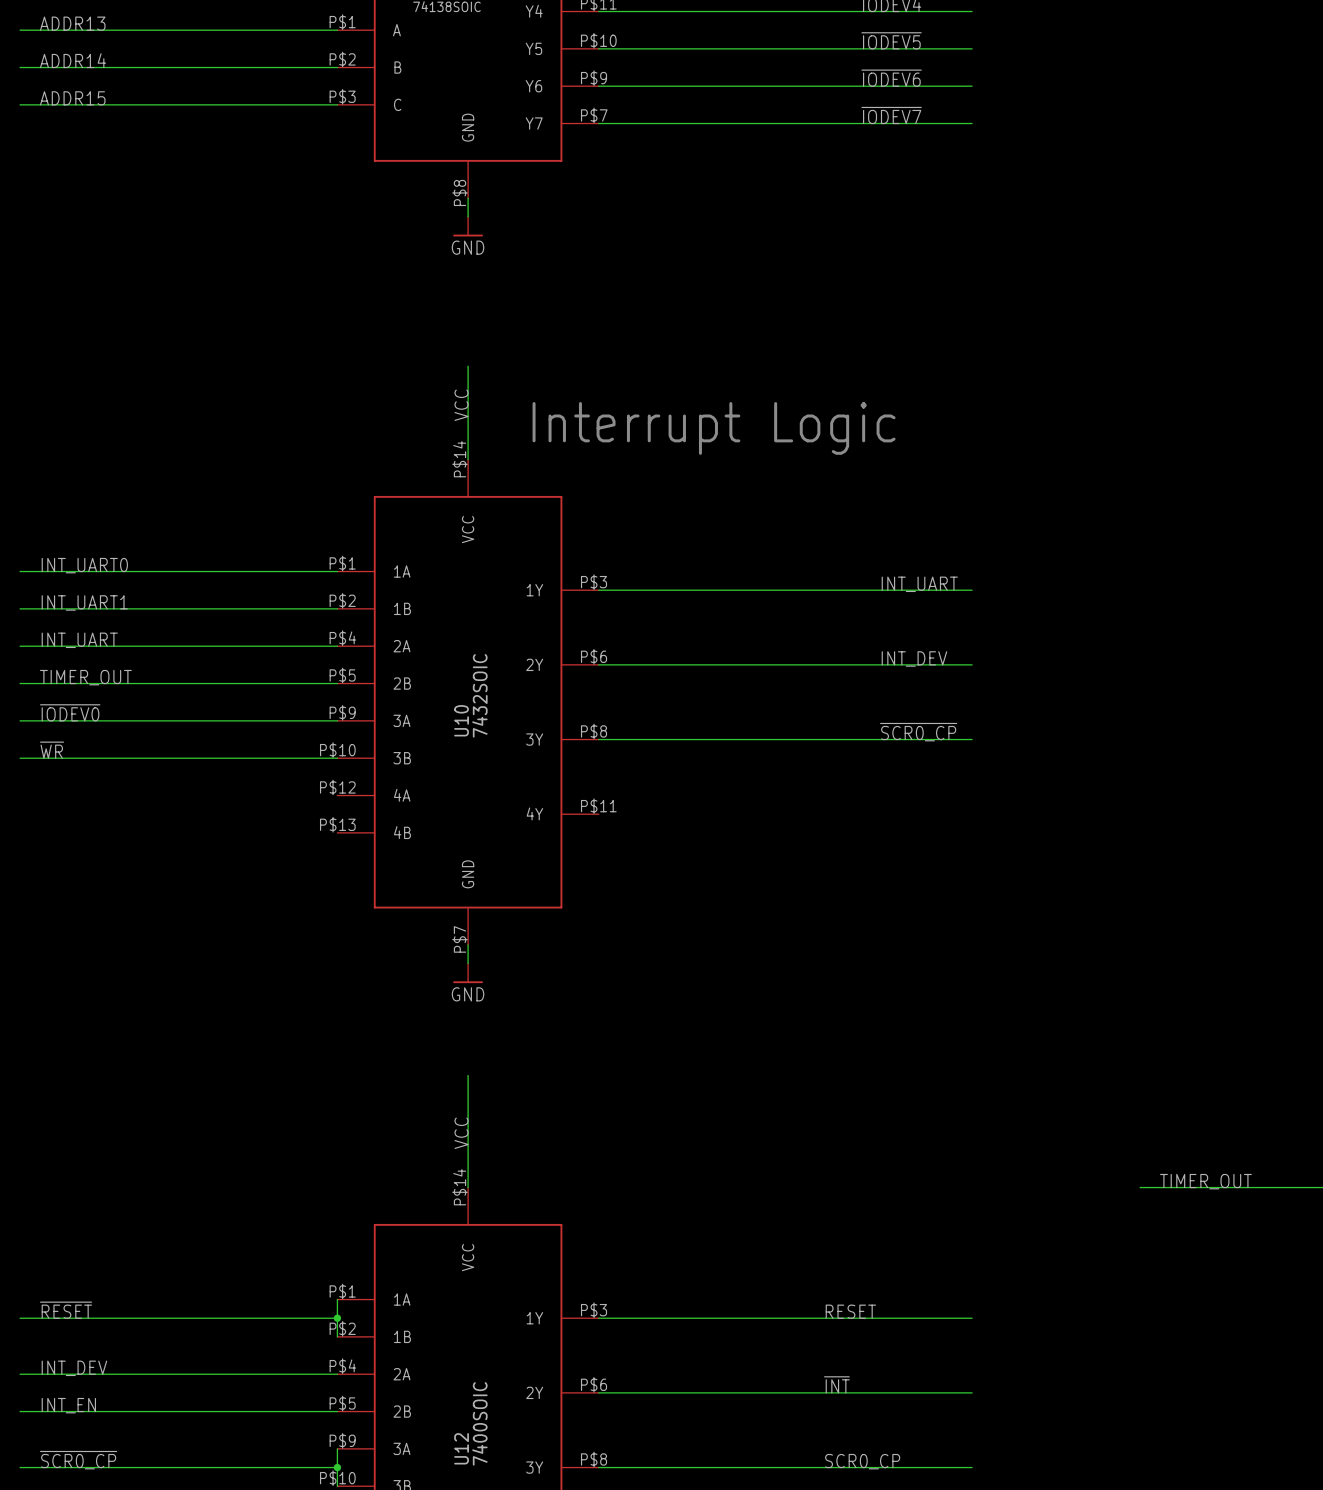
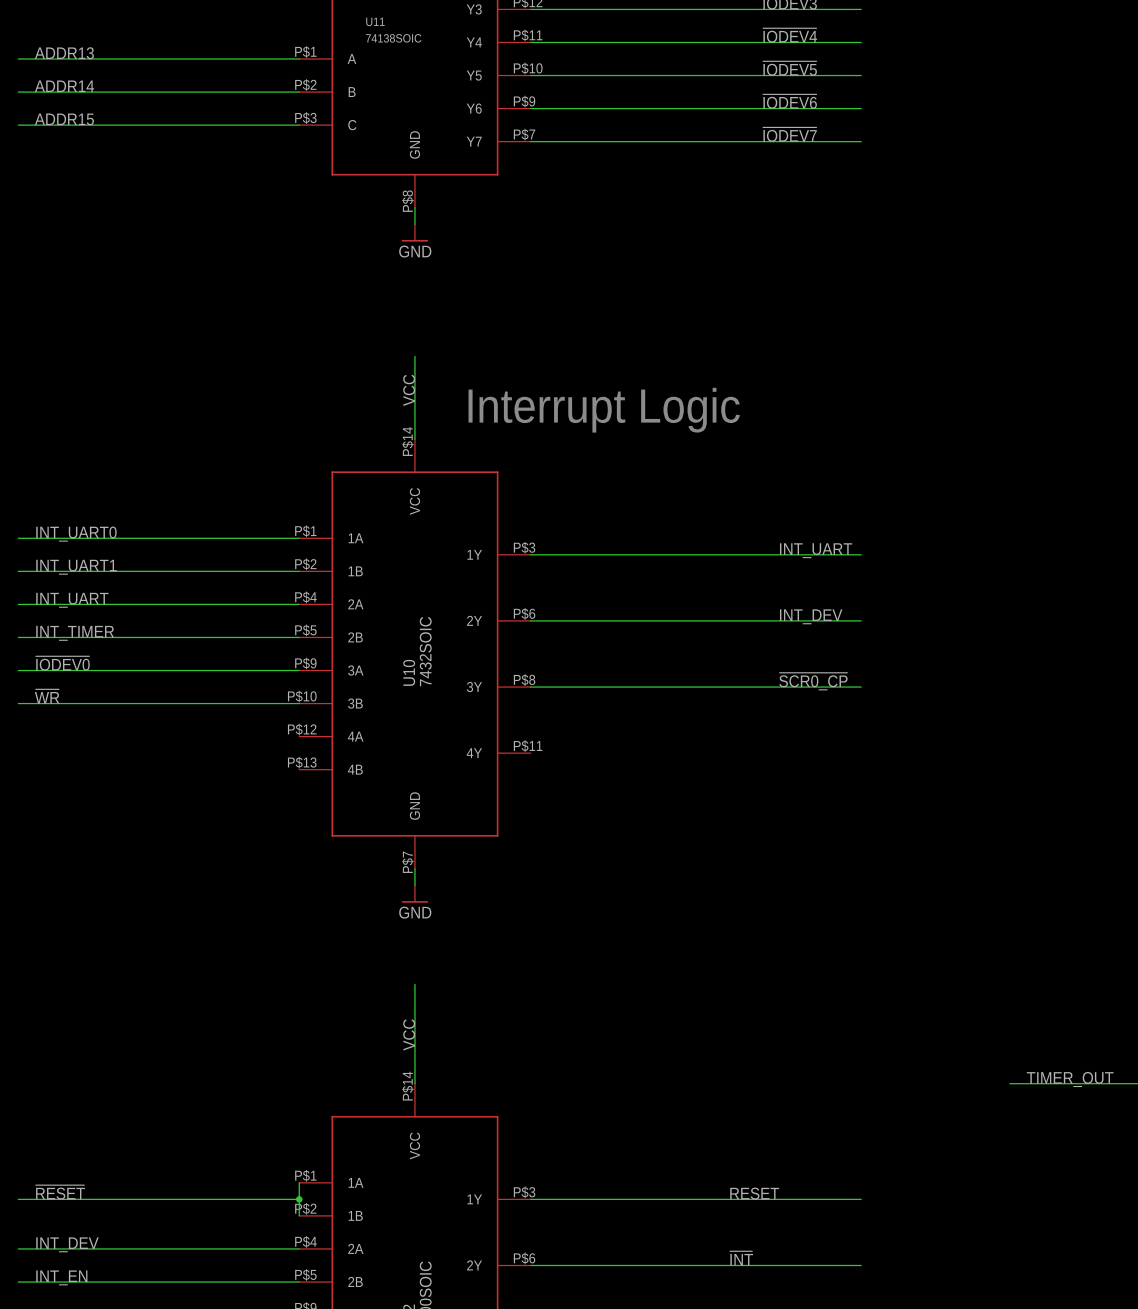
label: TIMER_OUT (85, 677) -> INT_TIMER (75, 633)

